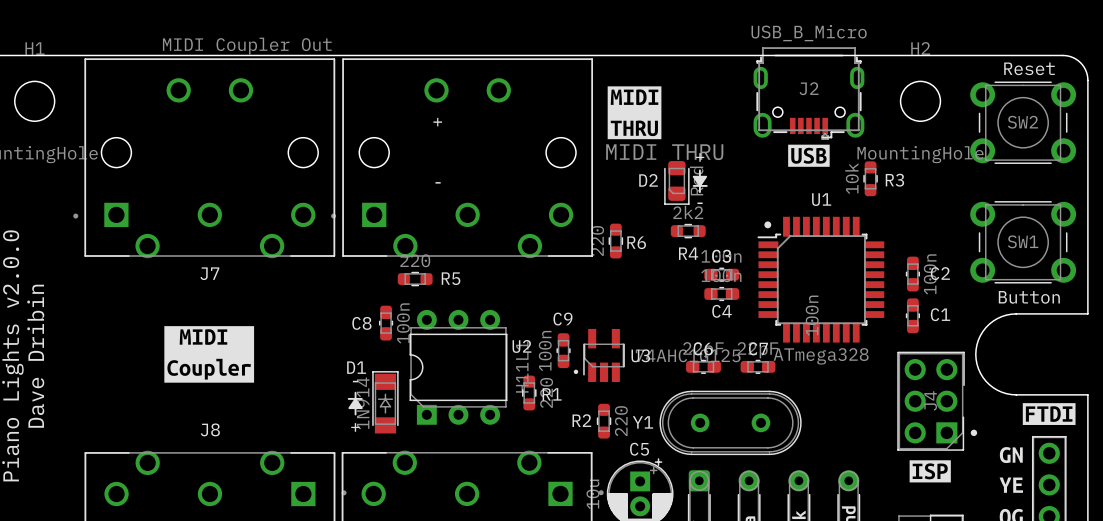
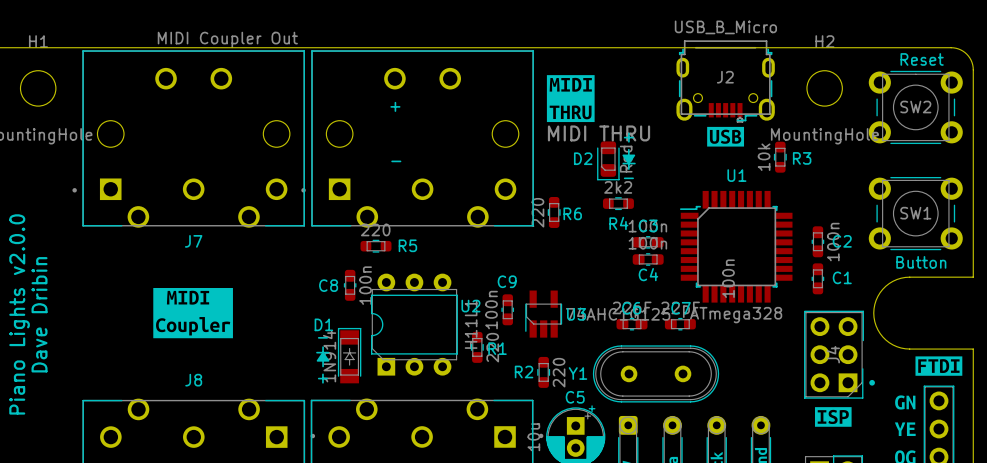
drawing: [764, 221, 772, 229] -> none
drawing: [573, 369, 579, 375] -> none

